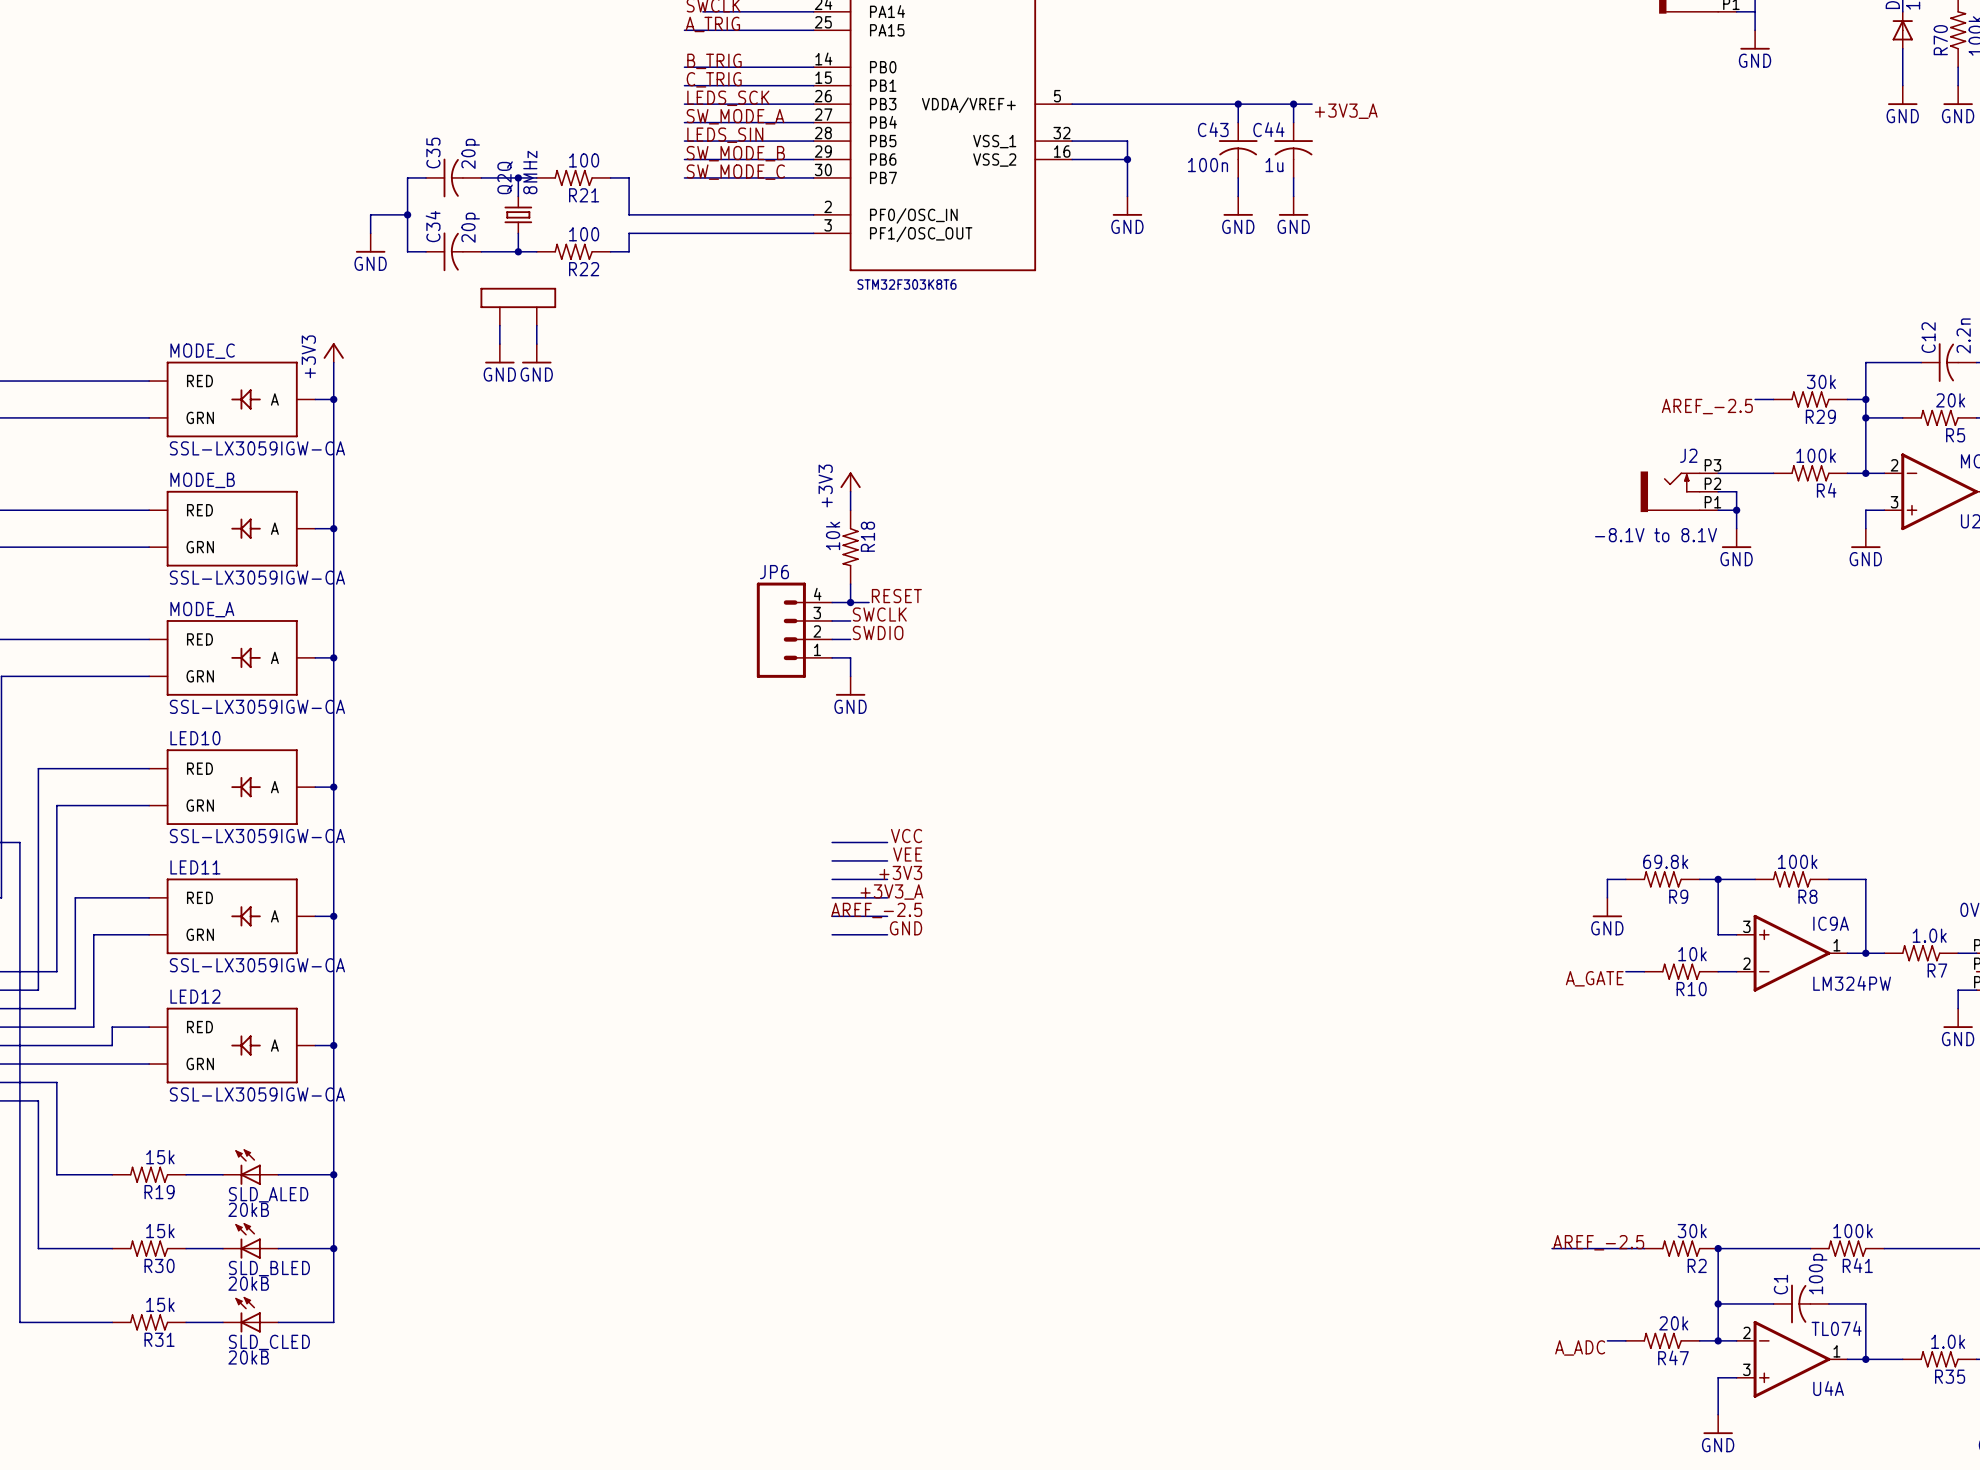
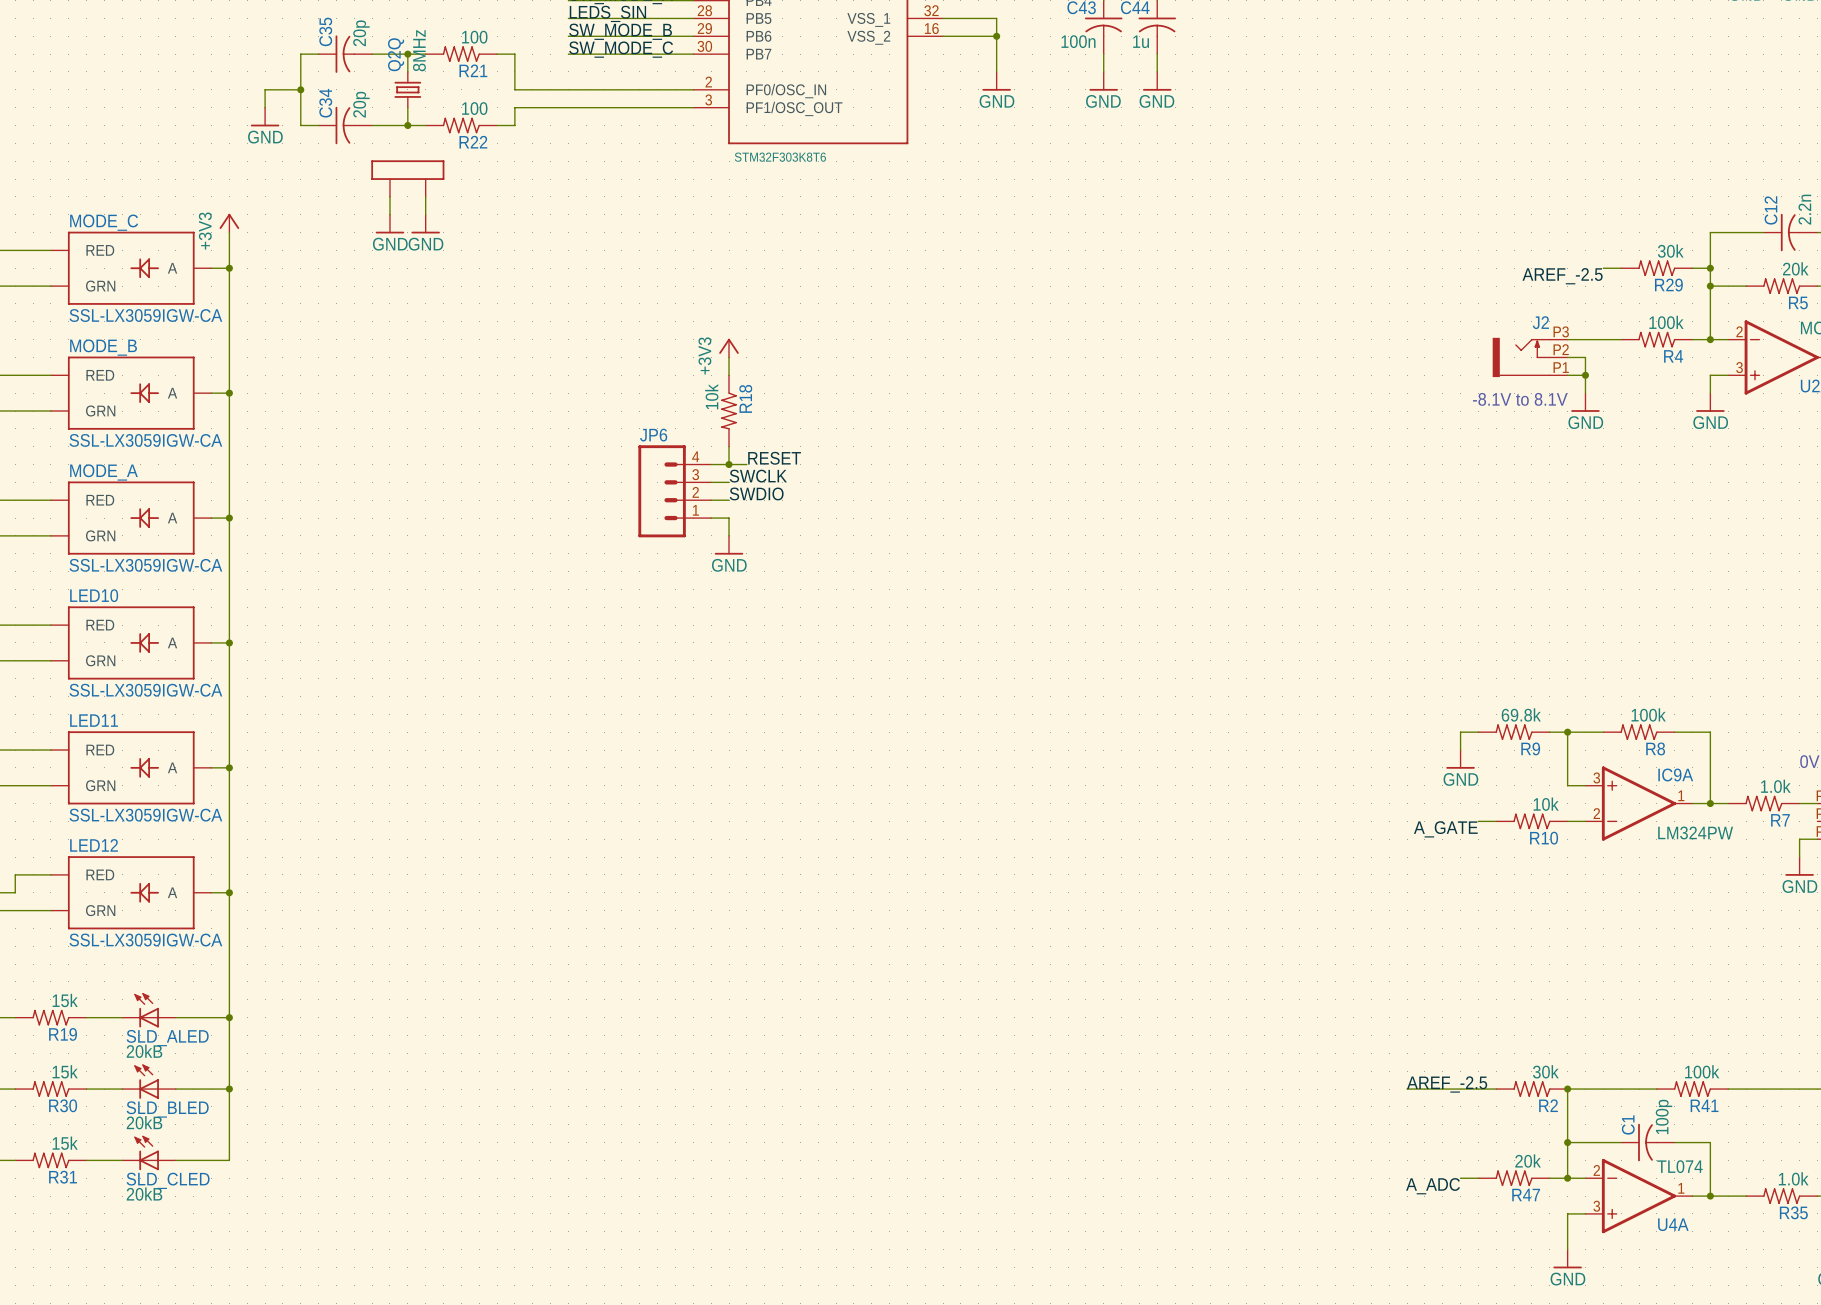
label: VCC (906, 836) -> none
wire: (832, 842) (887, 842) -> none
label: VEE (907, 854) -> none
wire: (832, 860) (887, 860) -> none
label: +3V3 (900, 872) -> none
wire: (832, 879) (887, 879) -> none
label: +3V3_A (891, 892) -> none
wire: (832, 897) (887, 897) -> none
label: AREF_-2.5 (876, 910) -> none
wire: (832, 916) (887, 916) -> none
label: GND (906, 928) -> none
wire: (832, 934) (887, 934) -> none

